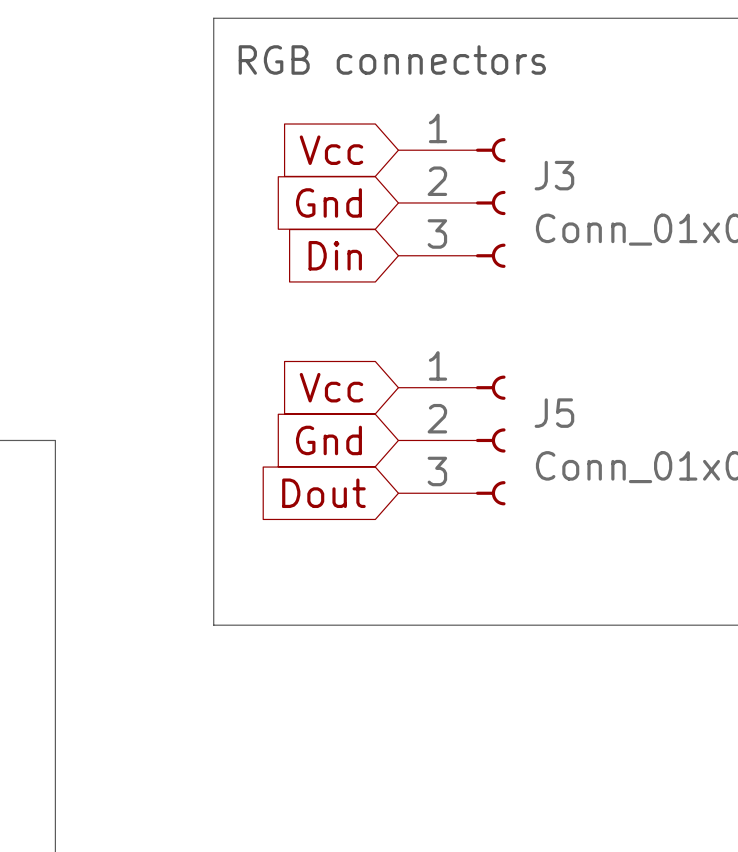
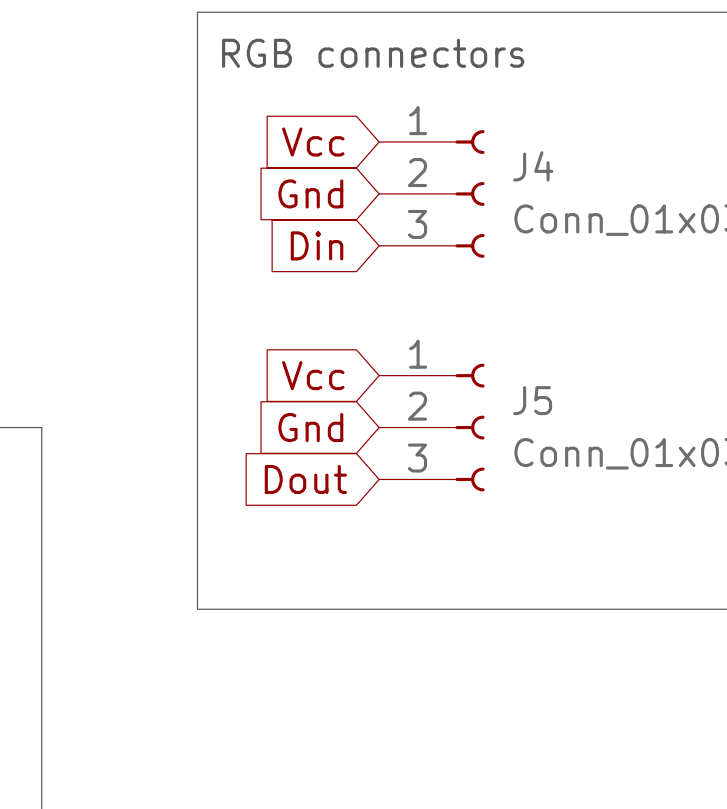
J3 name: J3 (554, 175) -> J4 (533, 166)

